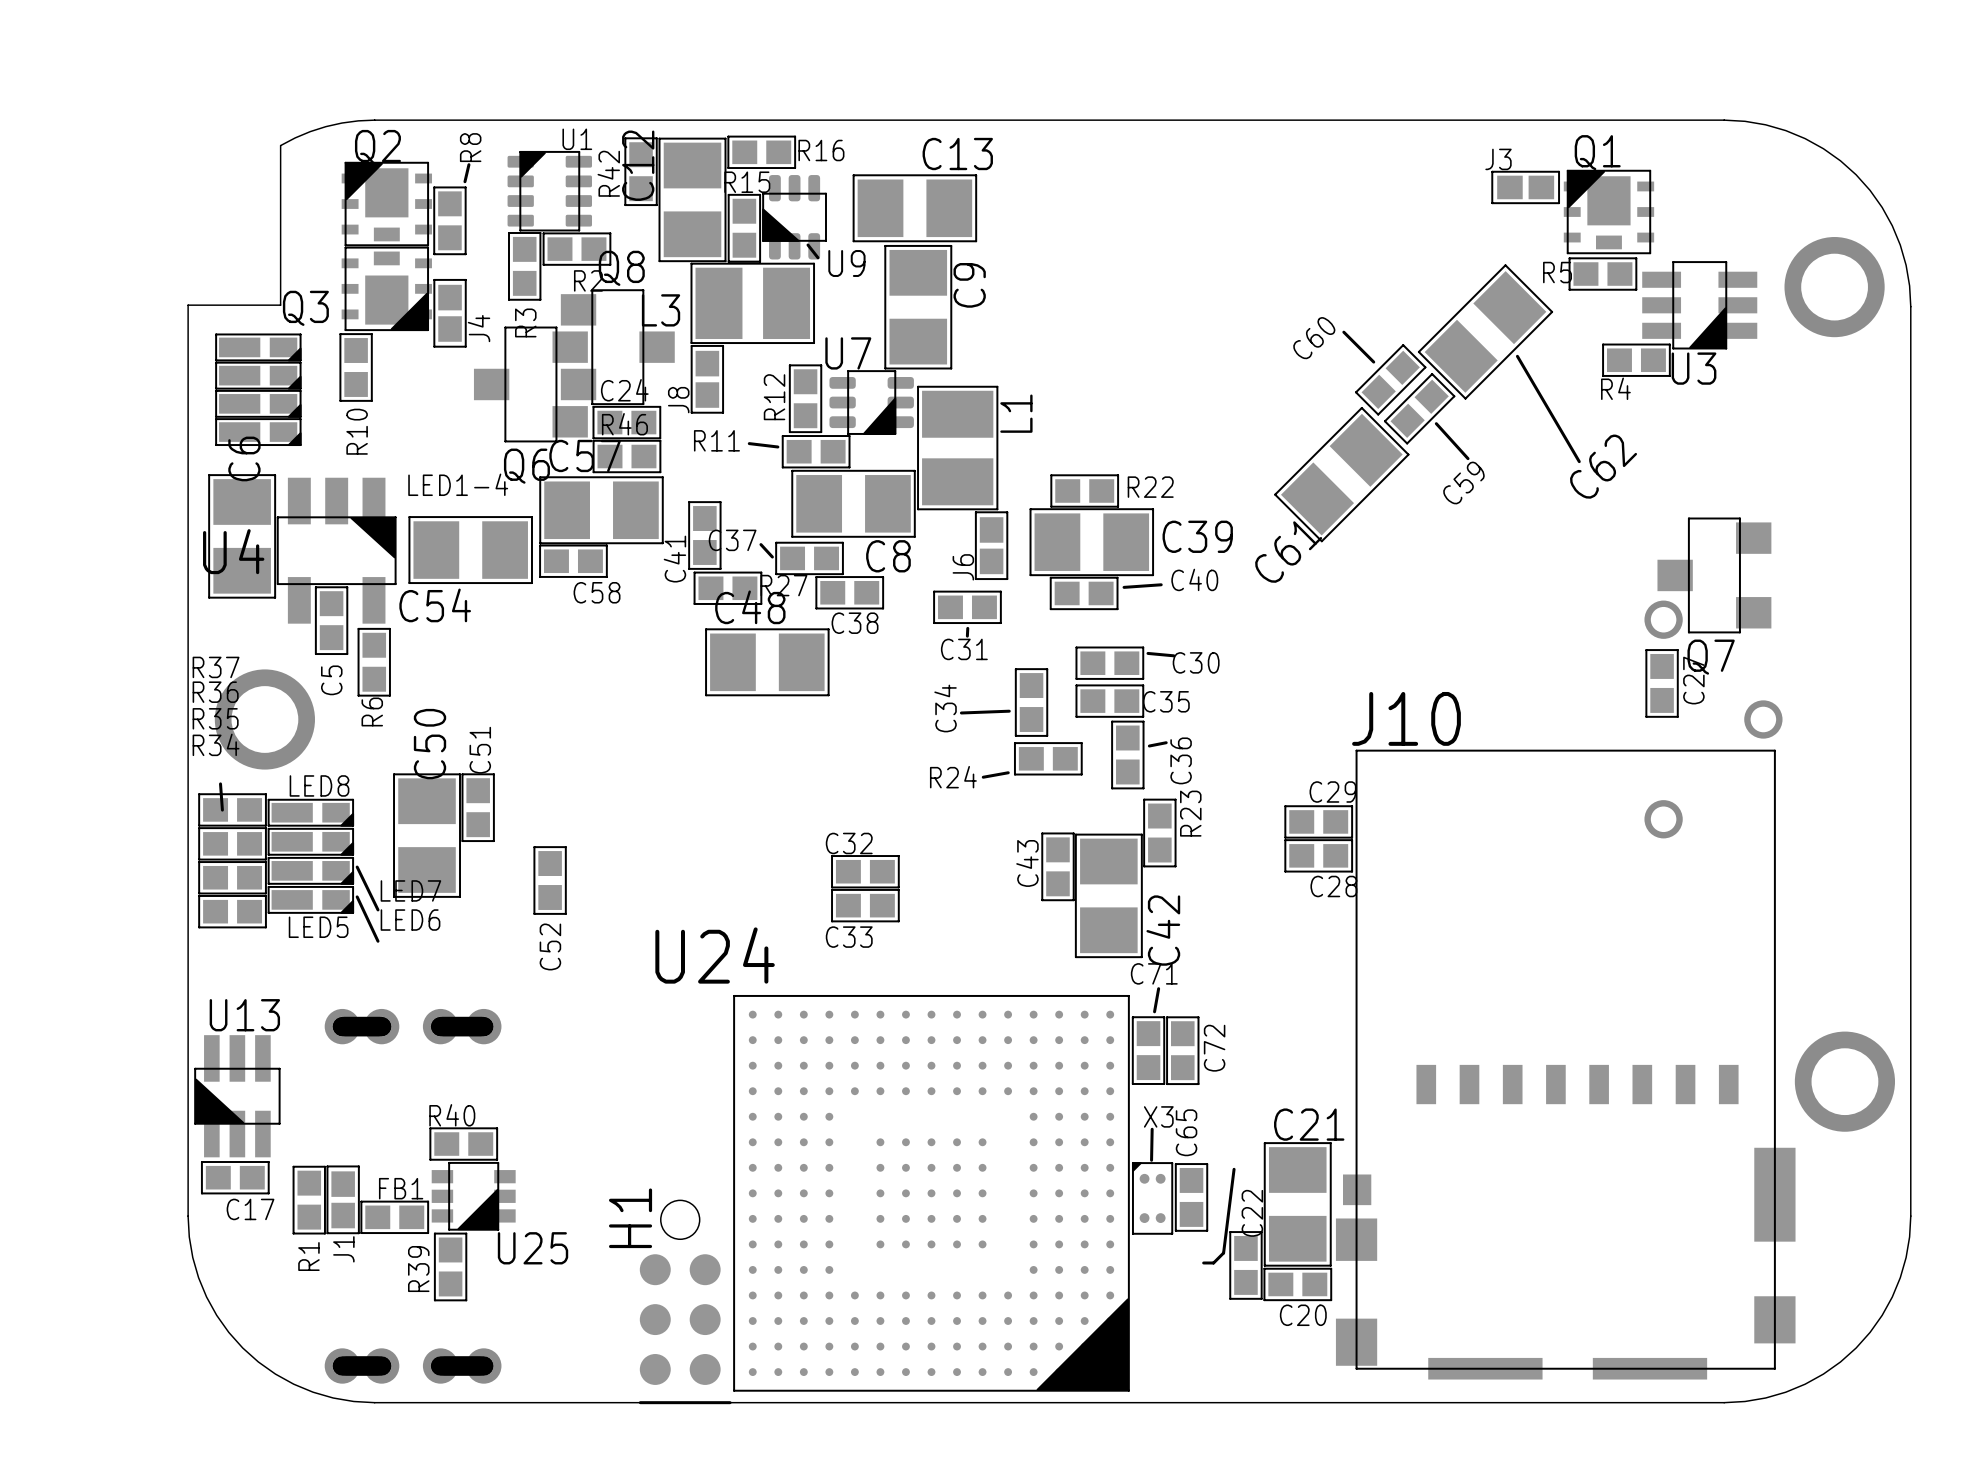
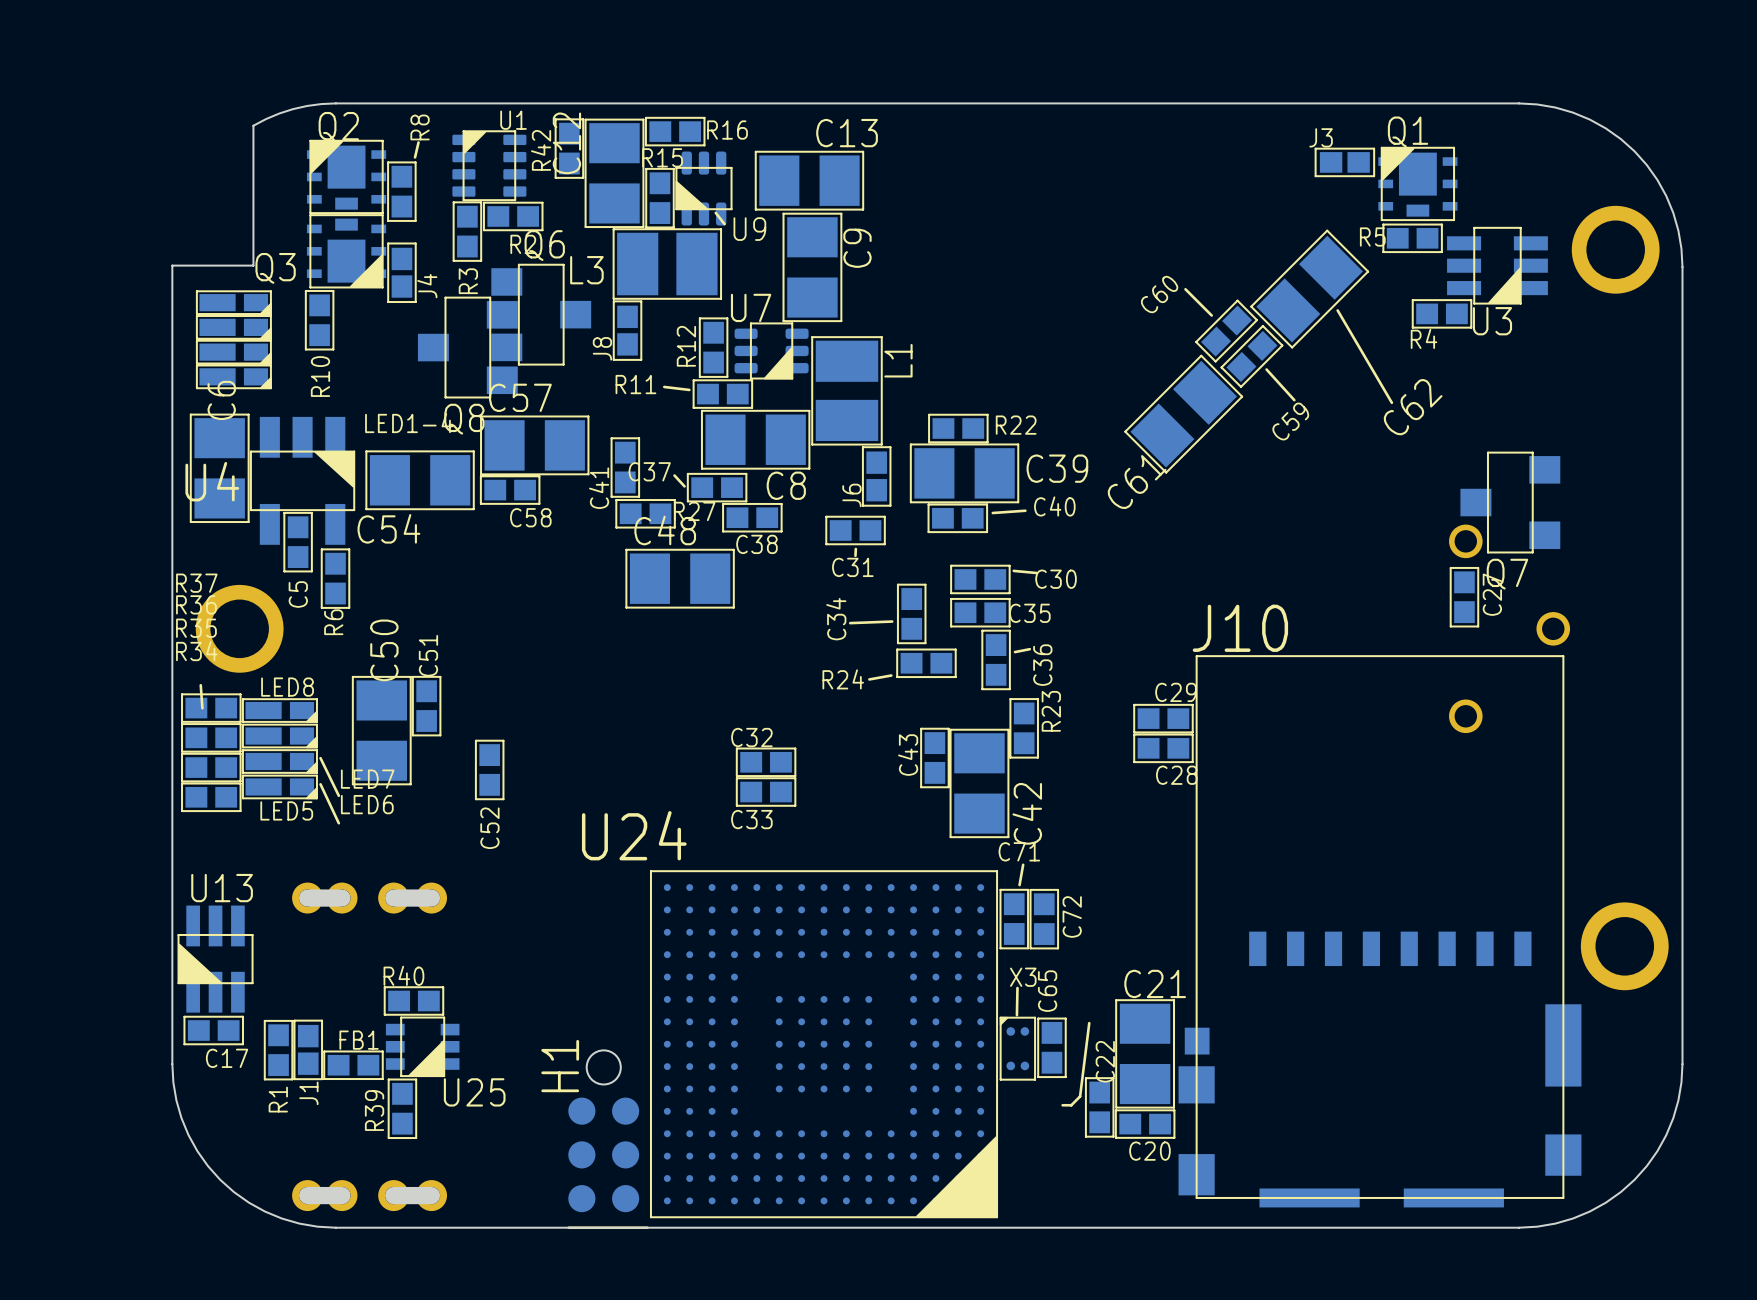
Q8 rotation: 0° (617, 347) -> 180° (467, 347)
Q8 position: (617, 347) -> (467, 347)
Q6 rotation: 0° (530, 384) -> 180° (541, 314)
Q6 position: (530, 384) -> (541, 314)
C24: (626, 422) -> none
R46: (626, 456) -> none

